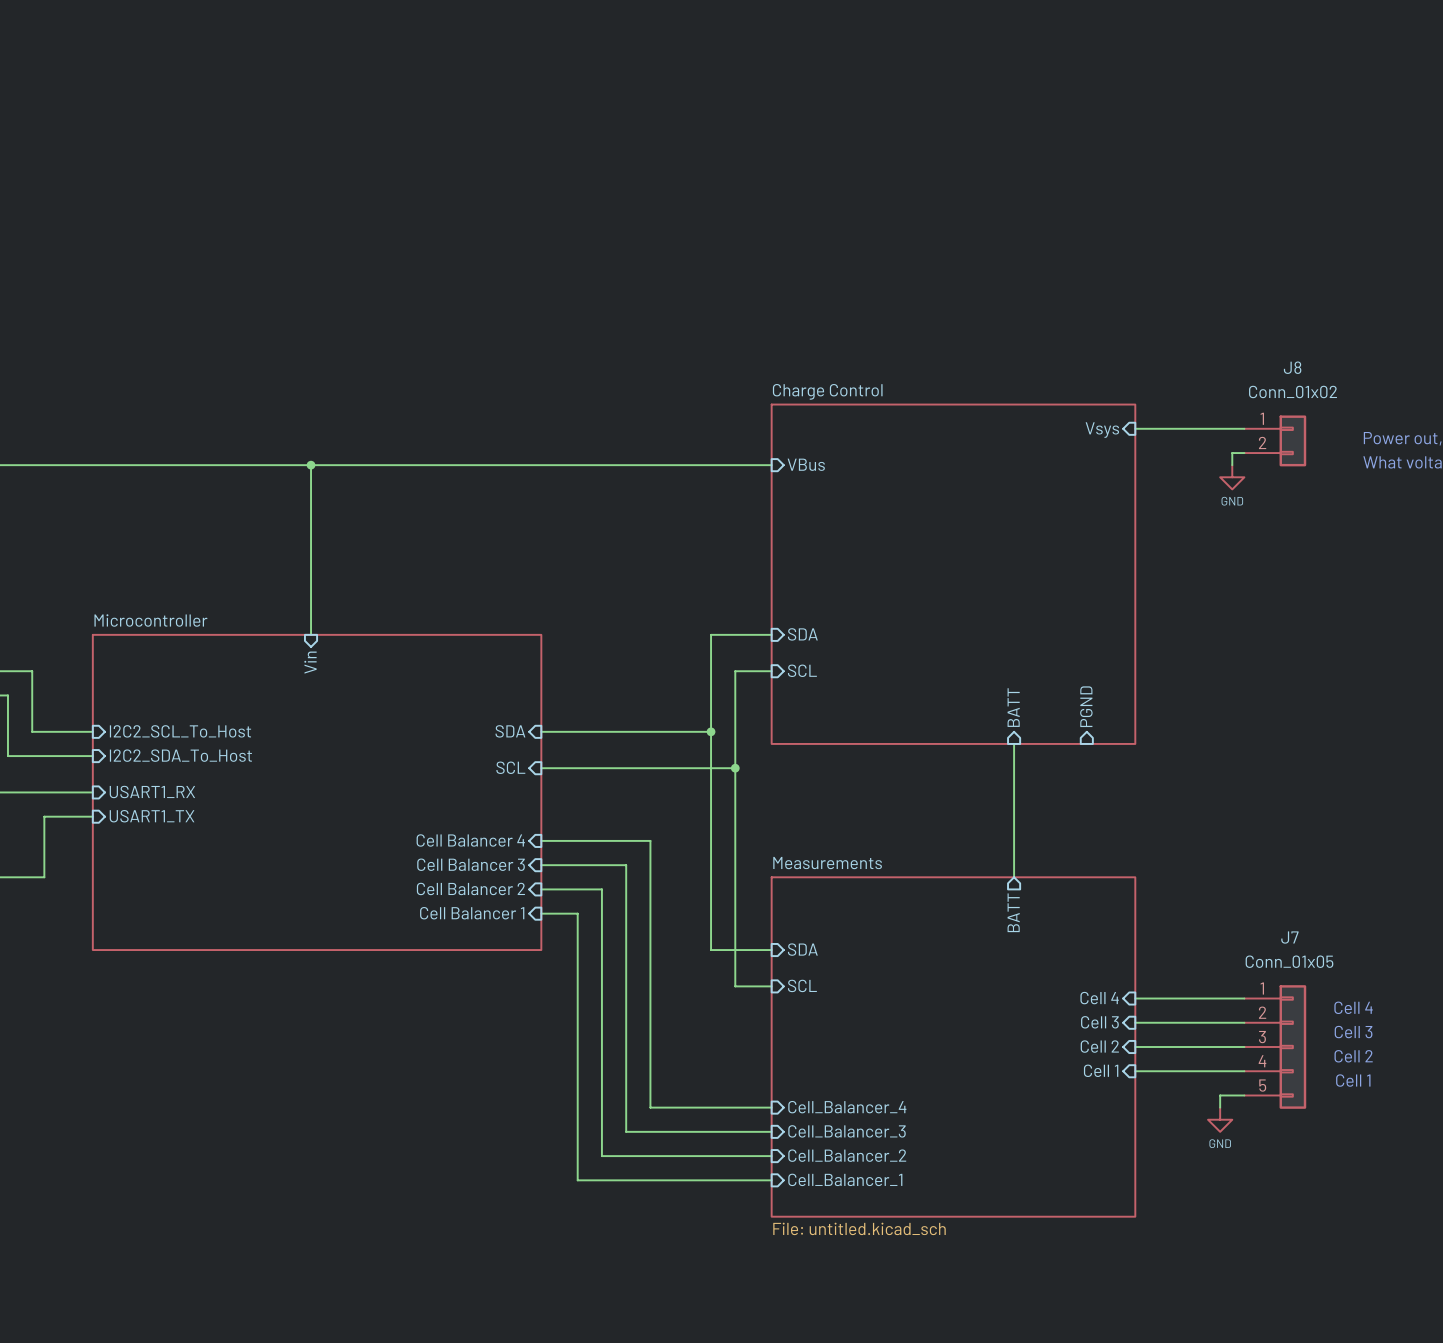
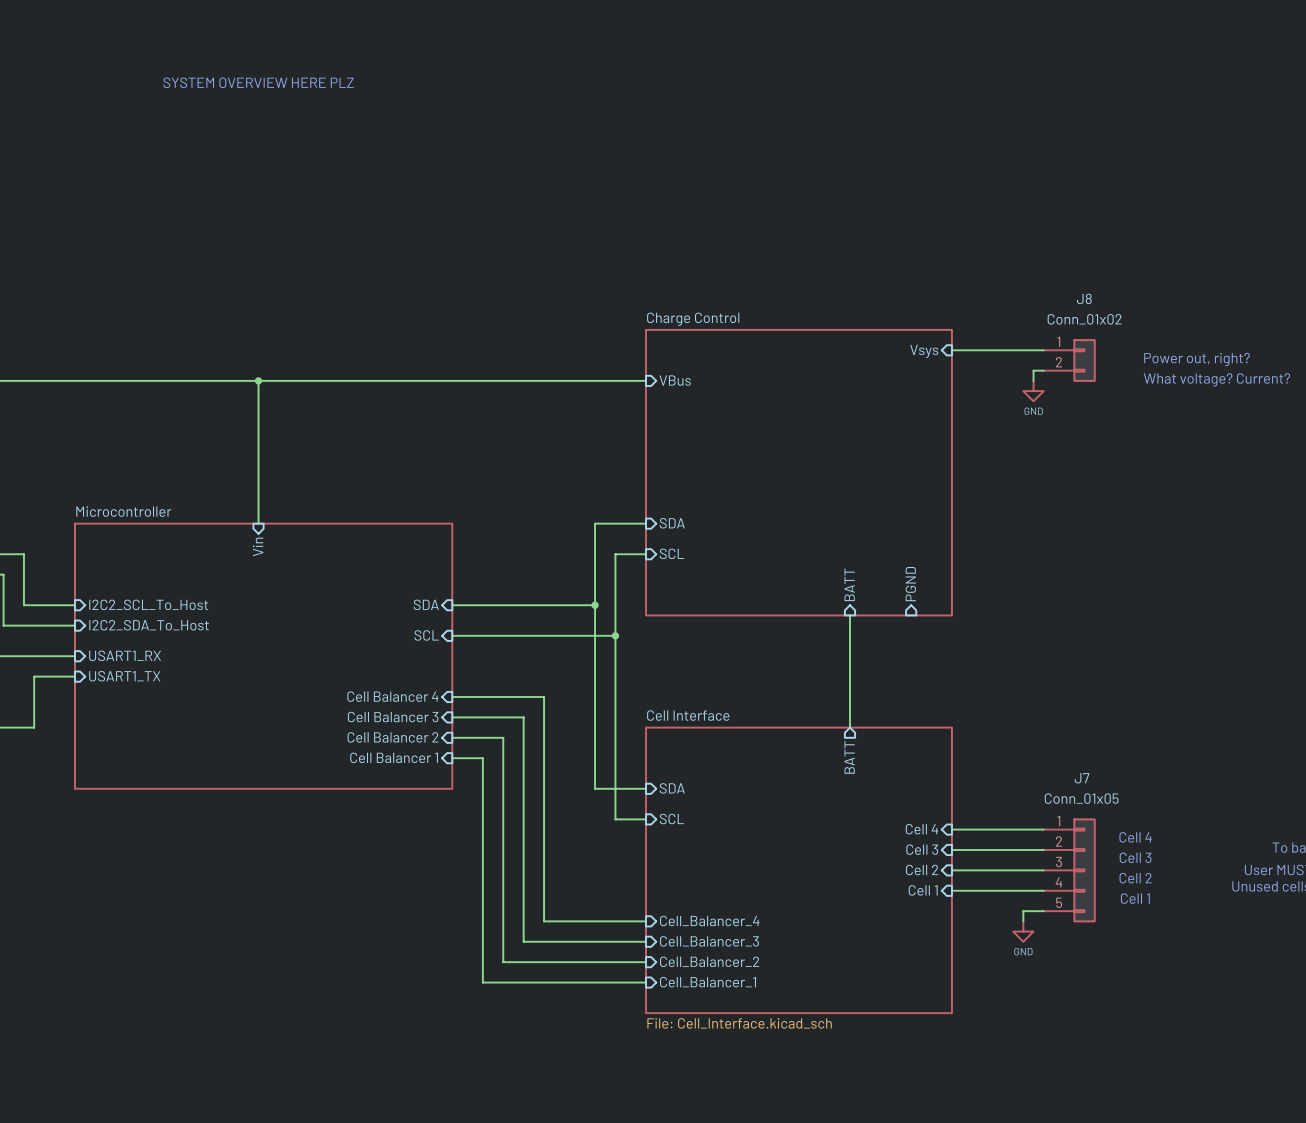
text: none -> SYSTEM OVERVIEW HERE PLZ (258, 82)
sheet Measurements name: Measurements (827, 863) -> Cell Interface (688, 715)
sheet Measurements value: File: untitled.kicad_sch (859, 1228) -> File: Cell_Interface.kicad_sch (739, 1023)

